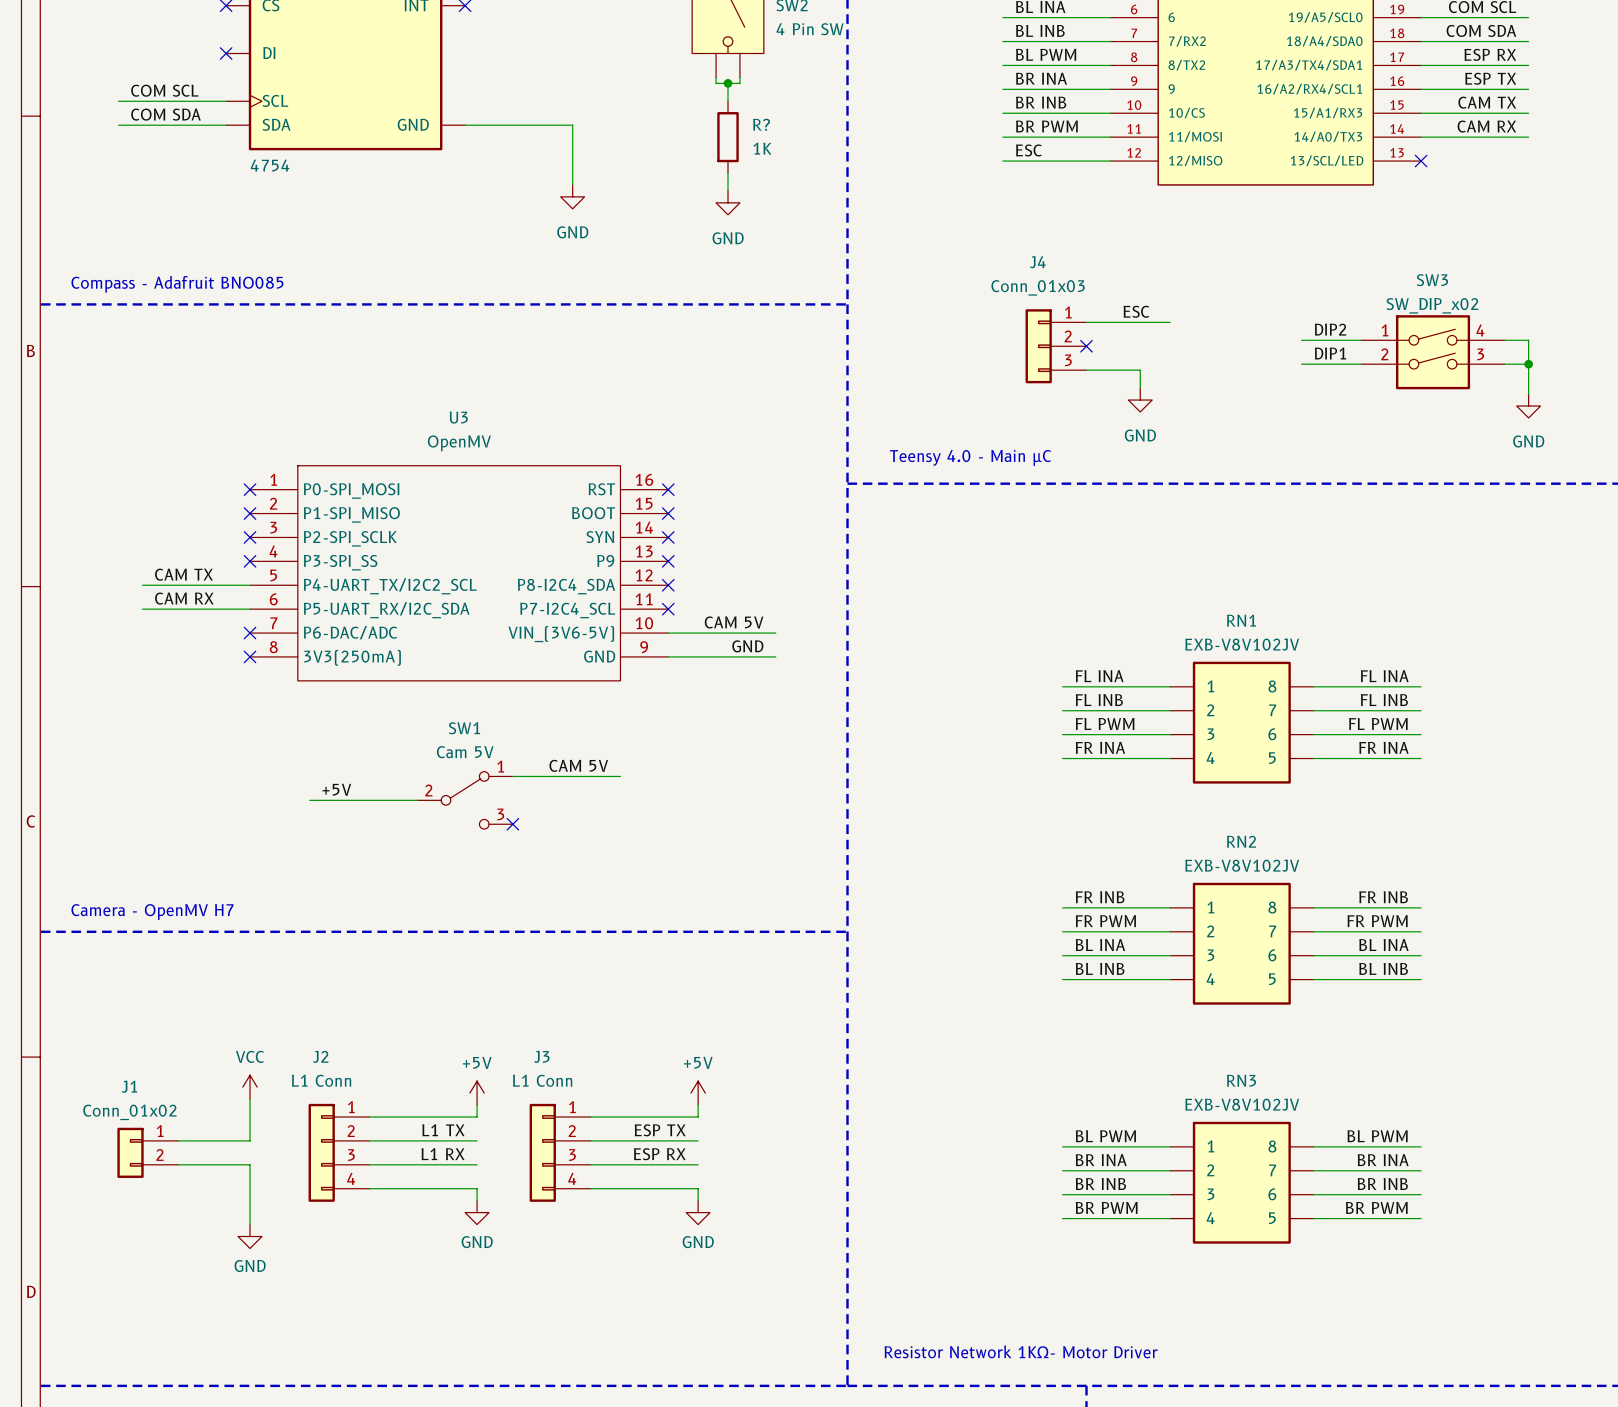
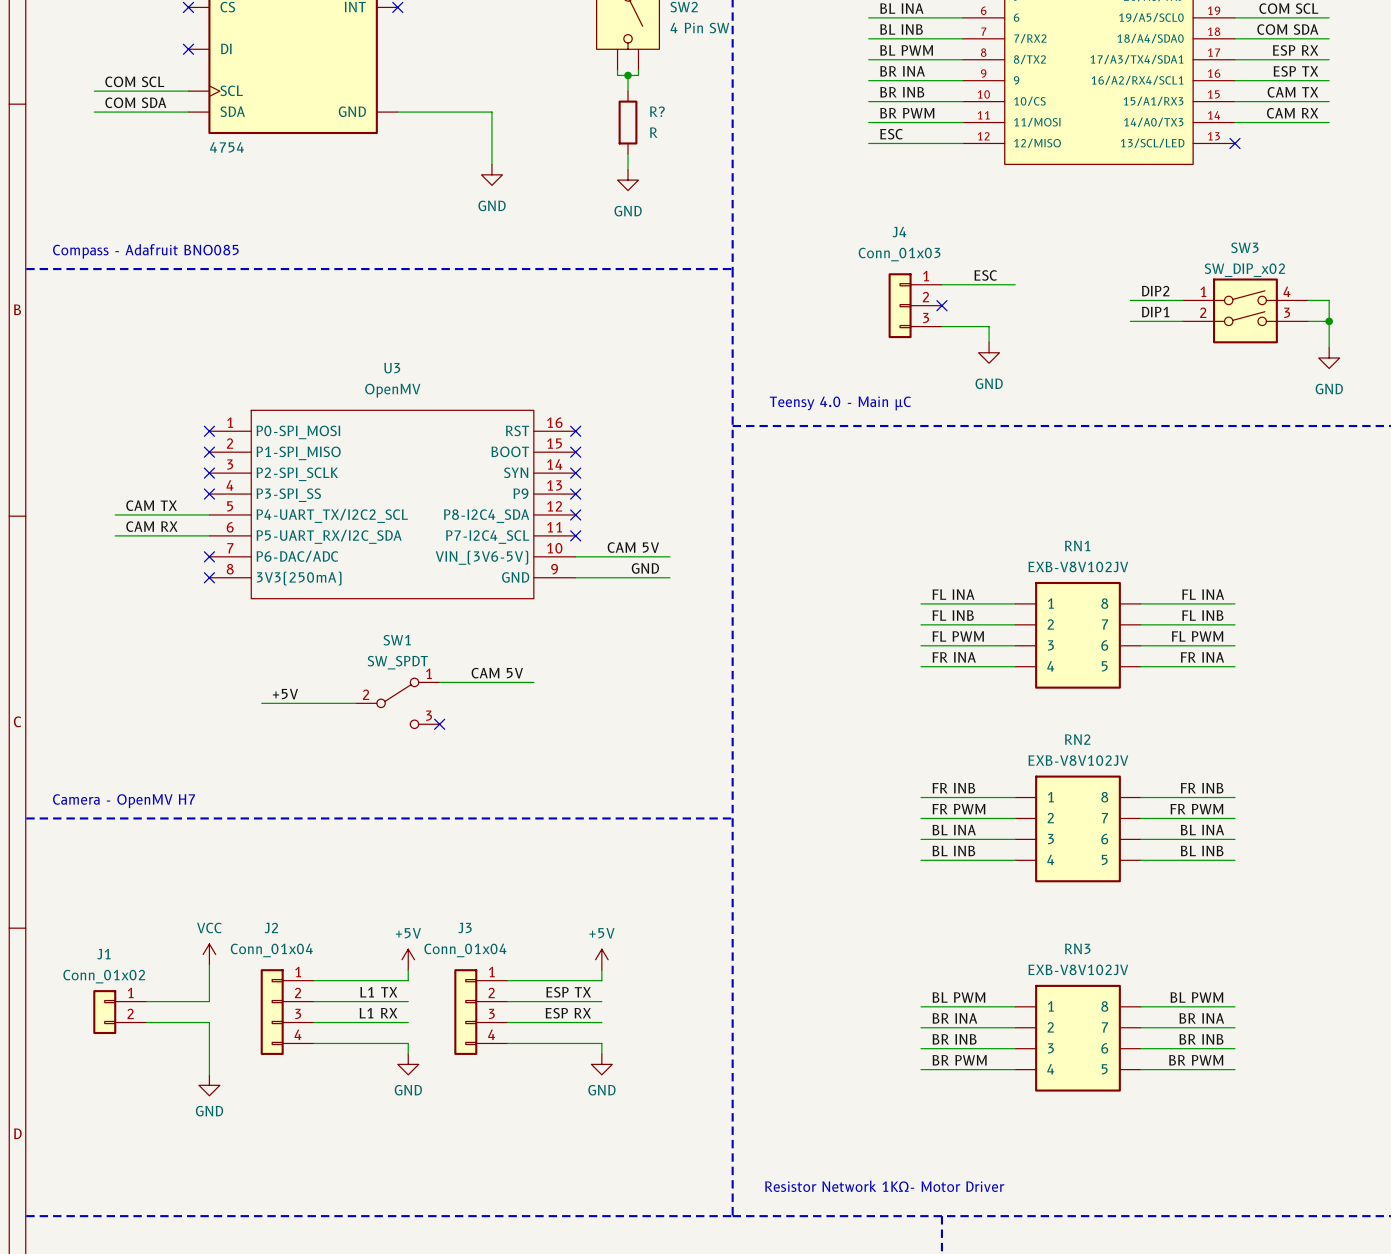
R? value: 1K (762, 148) -> R (653, 132)
SW1 value: Cam 5V (465, 752) -> SW_SPDT (397, 662)
J2 value: L1 Conn (321, 1080) -> Conn_01x04 (271, 950)
J3 value: L1 Conn (542, 1080) -> Conn_01x04 (465, 950)

